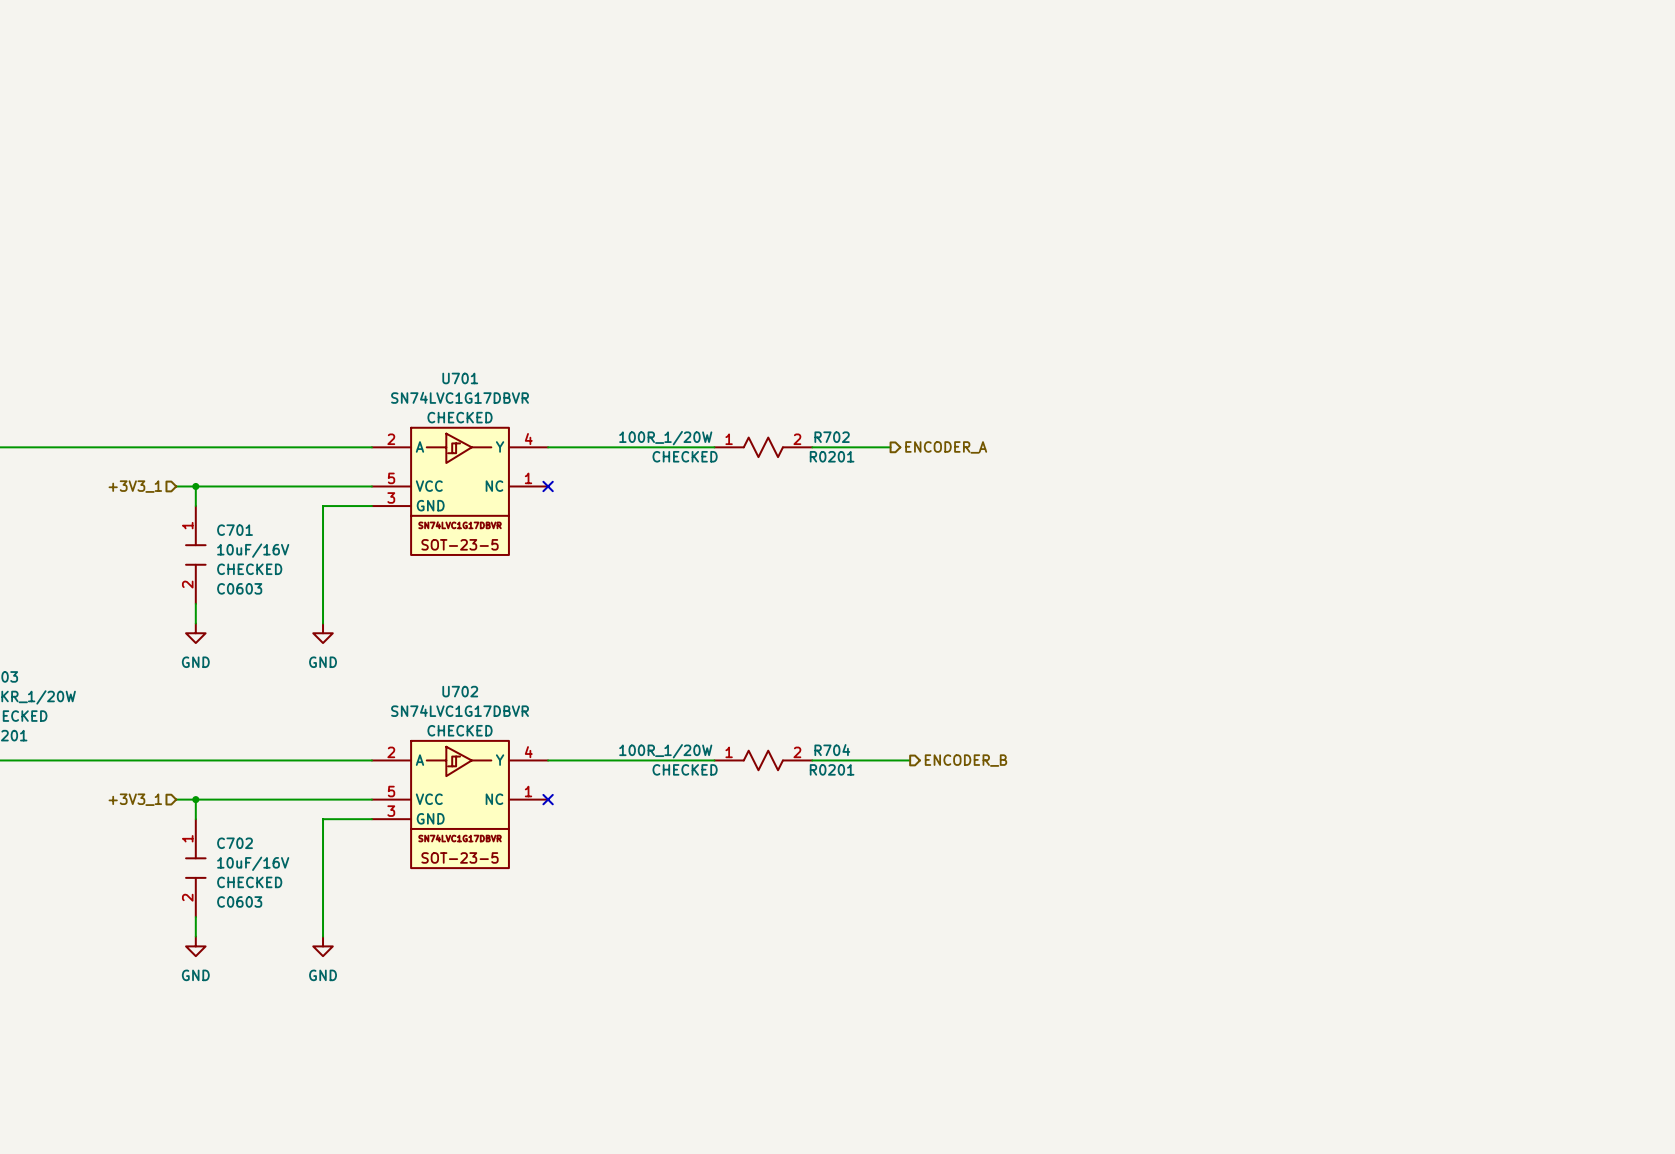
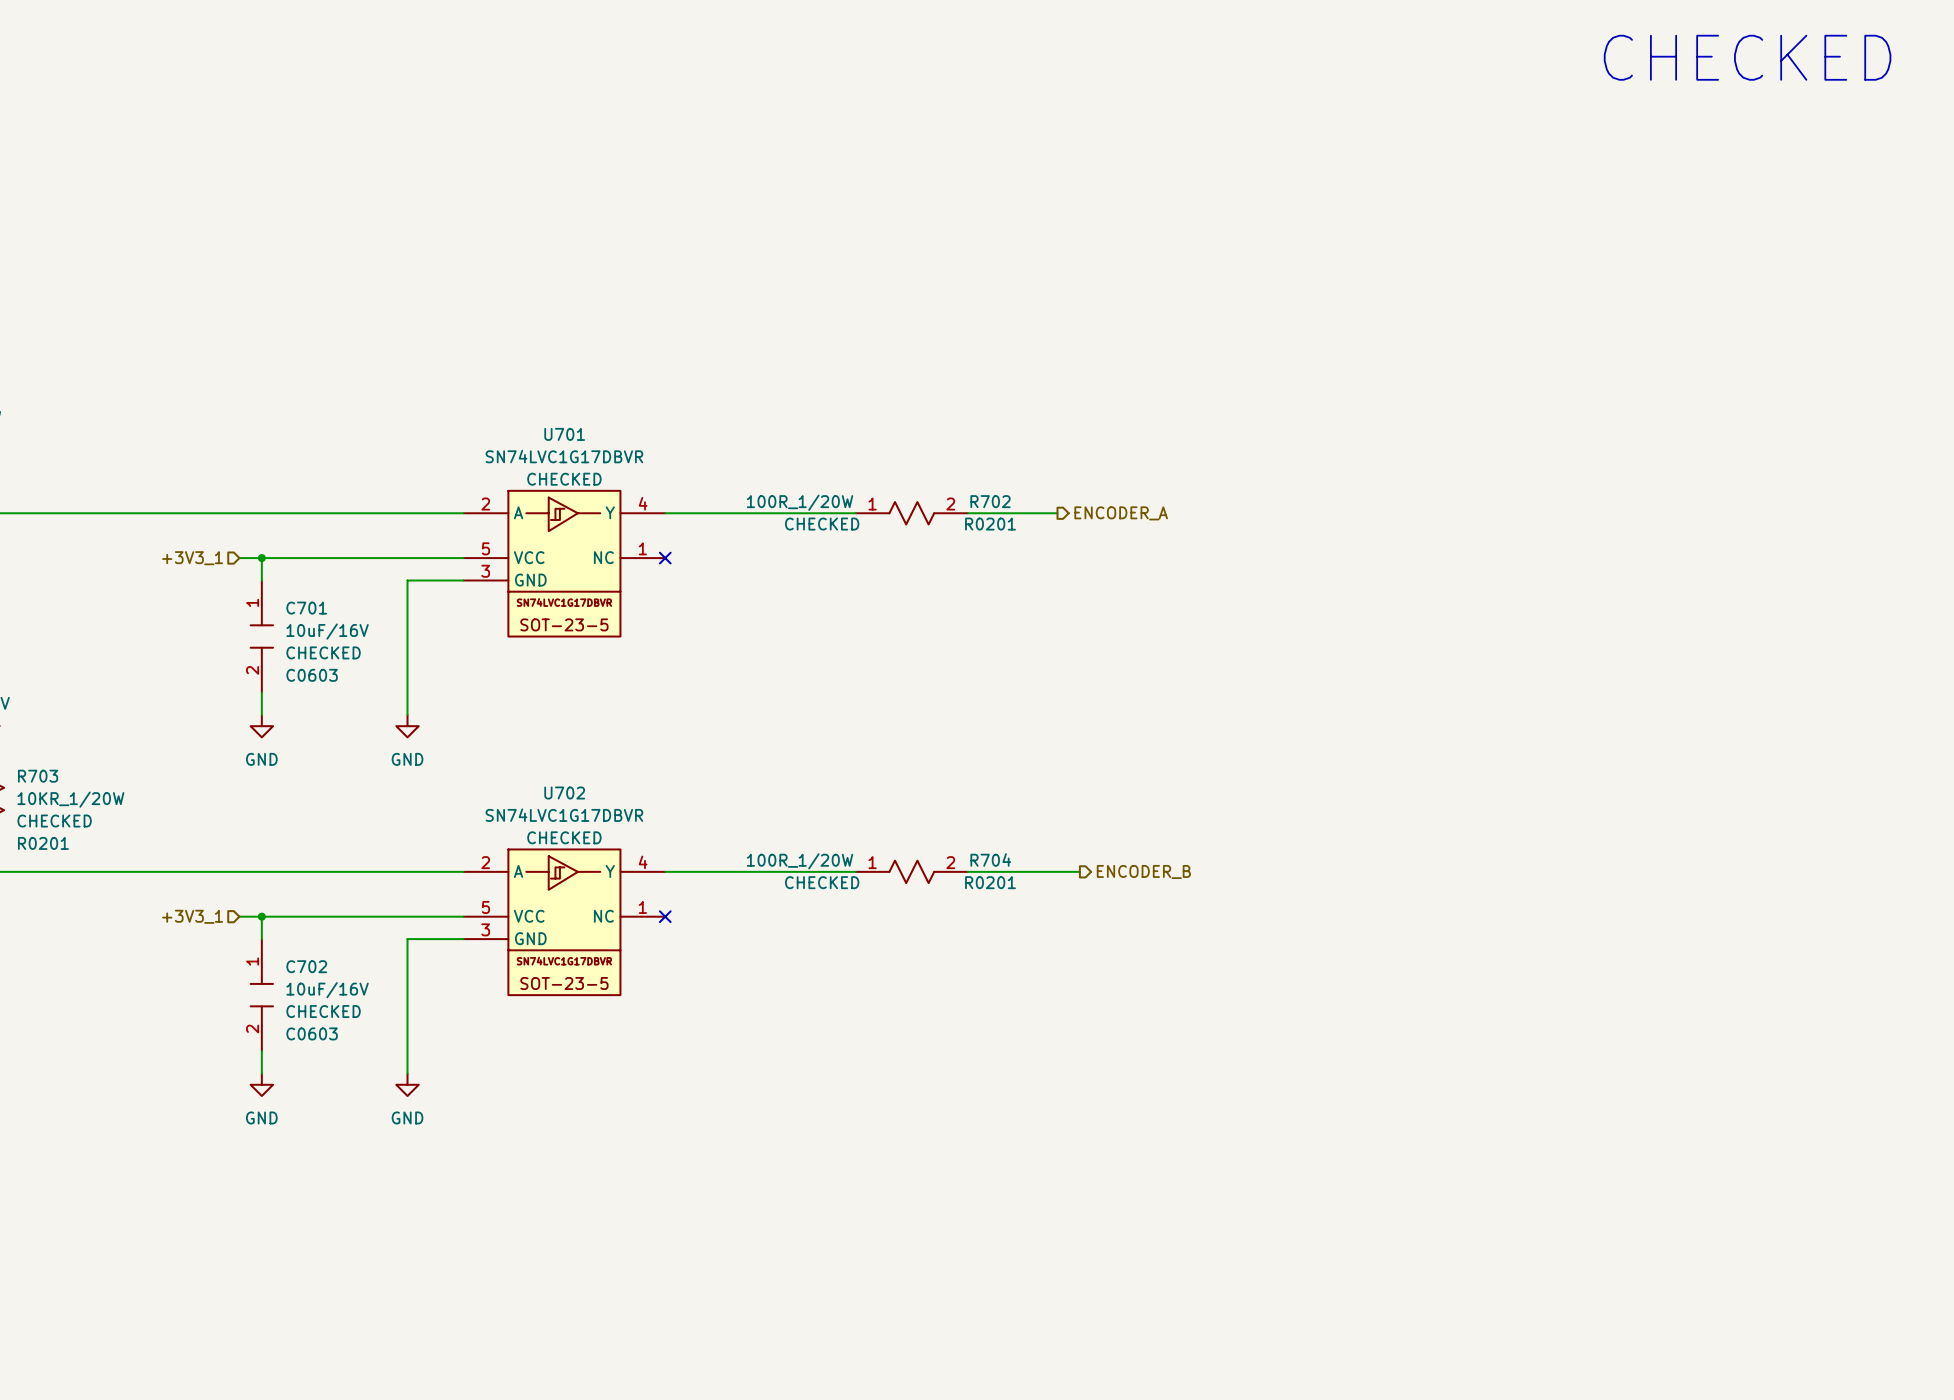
text: none -> CHECKED (1747, 57)

